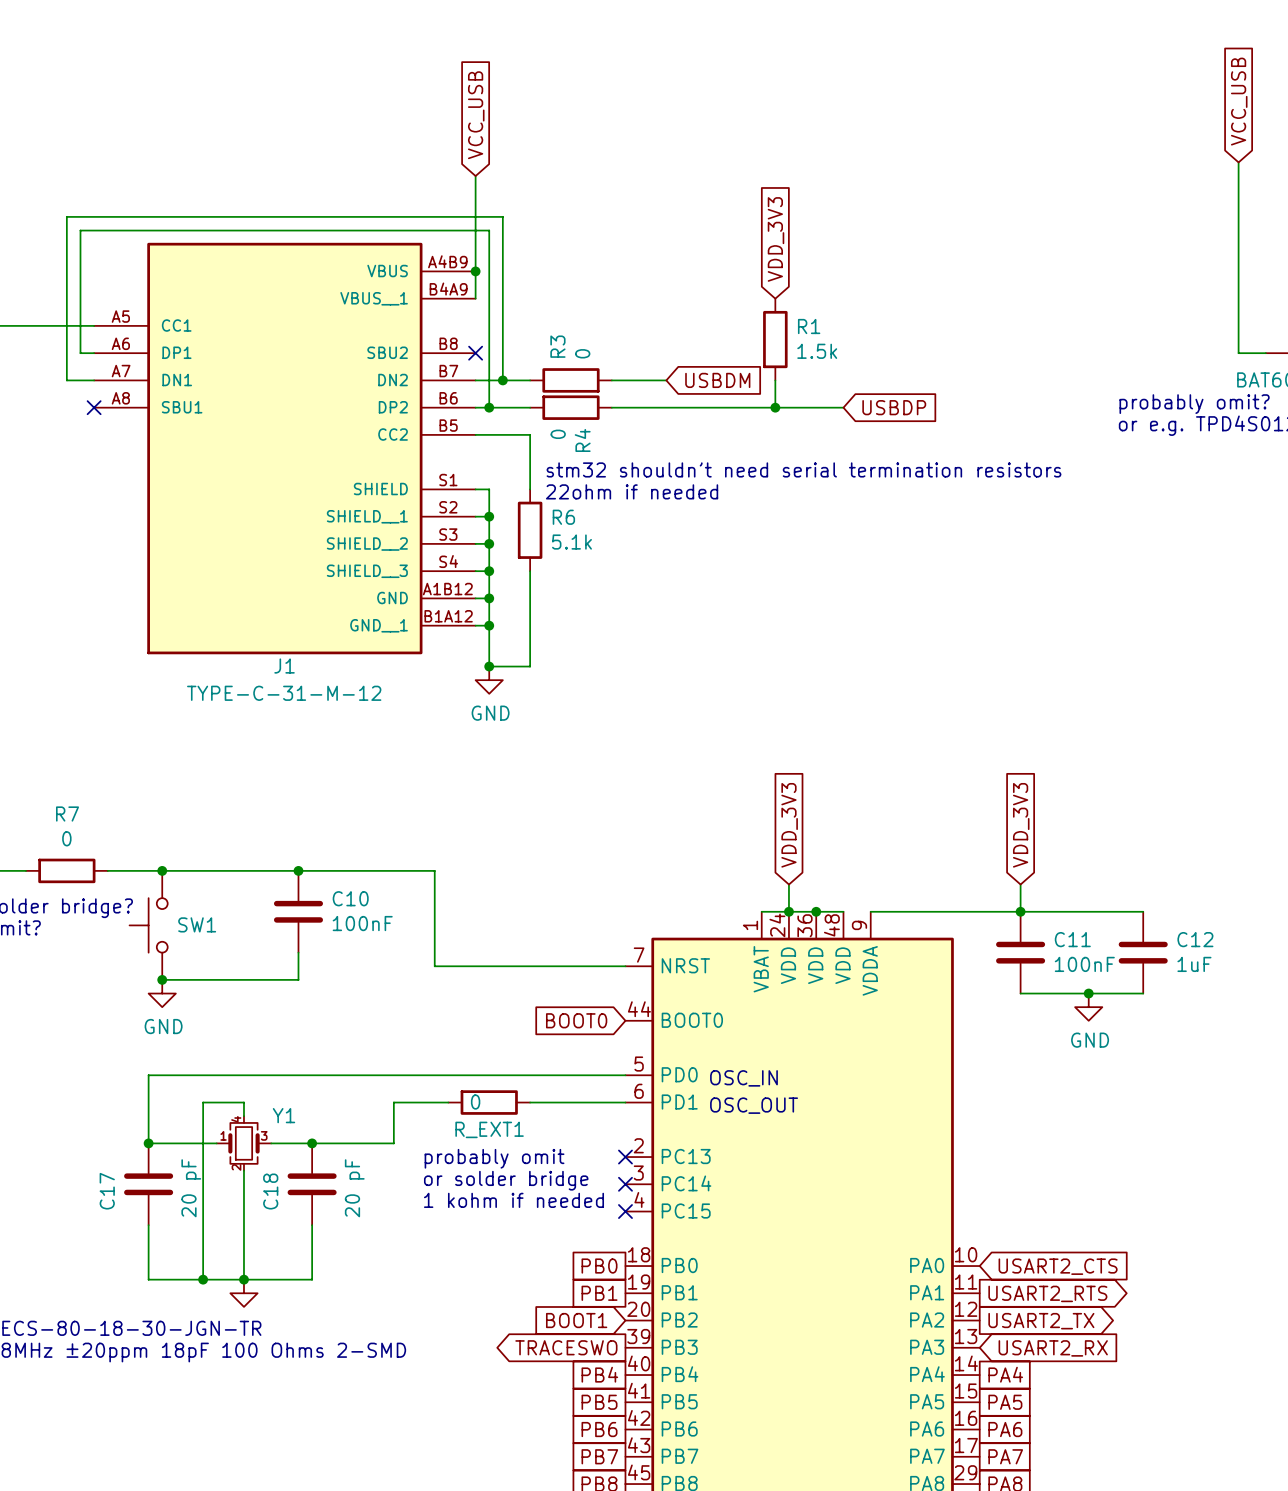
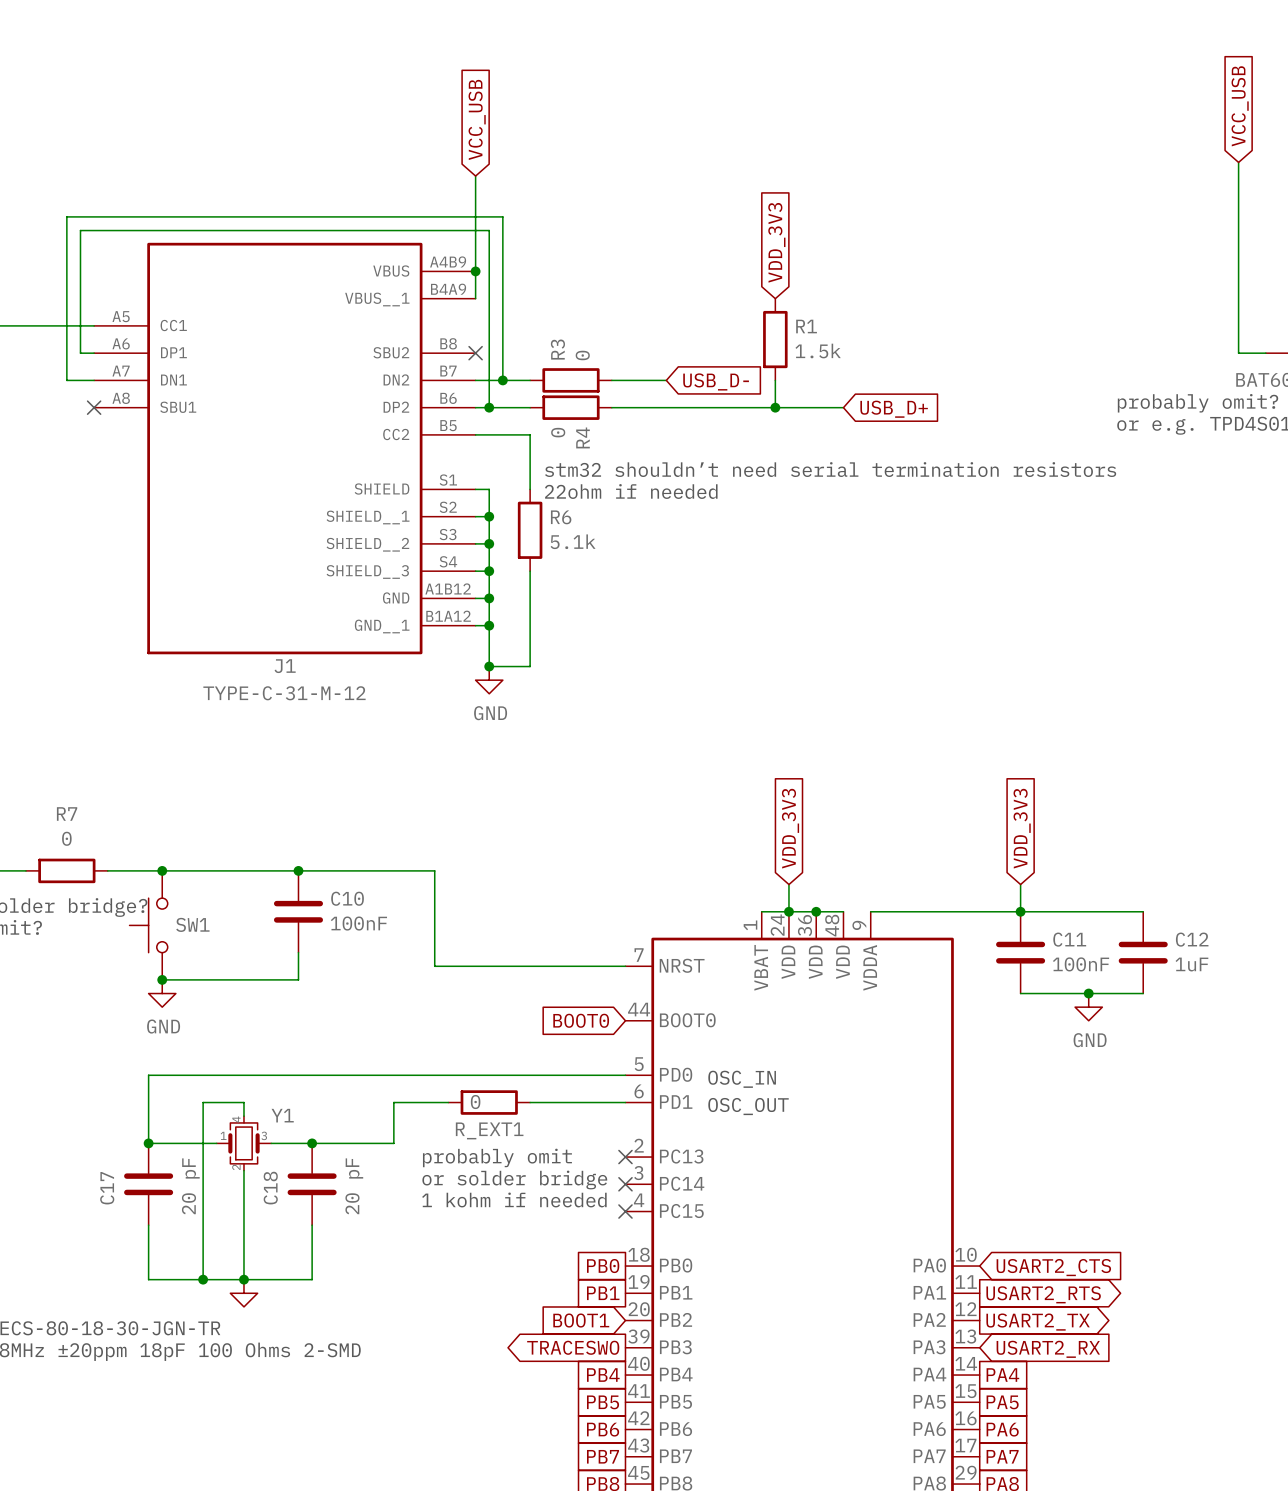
global label: USBDM (717, 380) -> USB_D- (716, 381)
global label: USBDP (894, 407) -> USB_D+ (894, 409)

